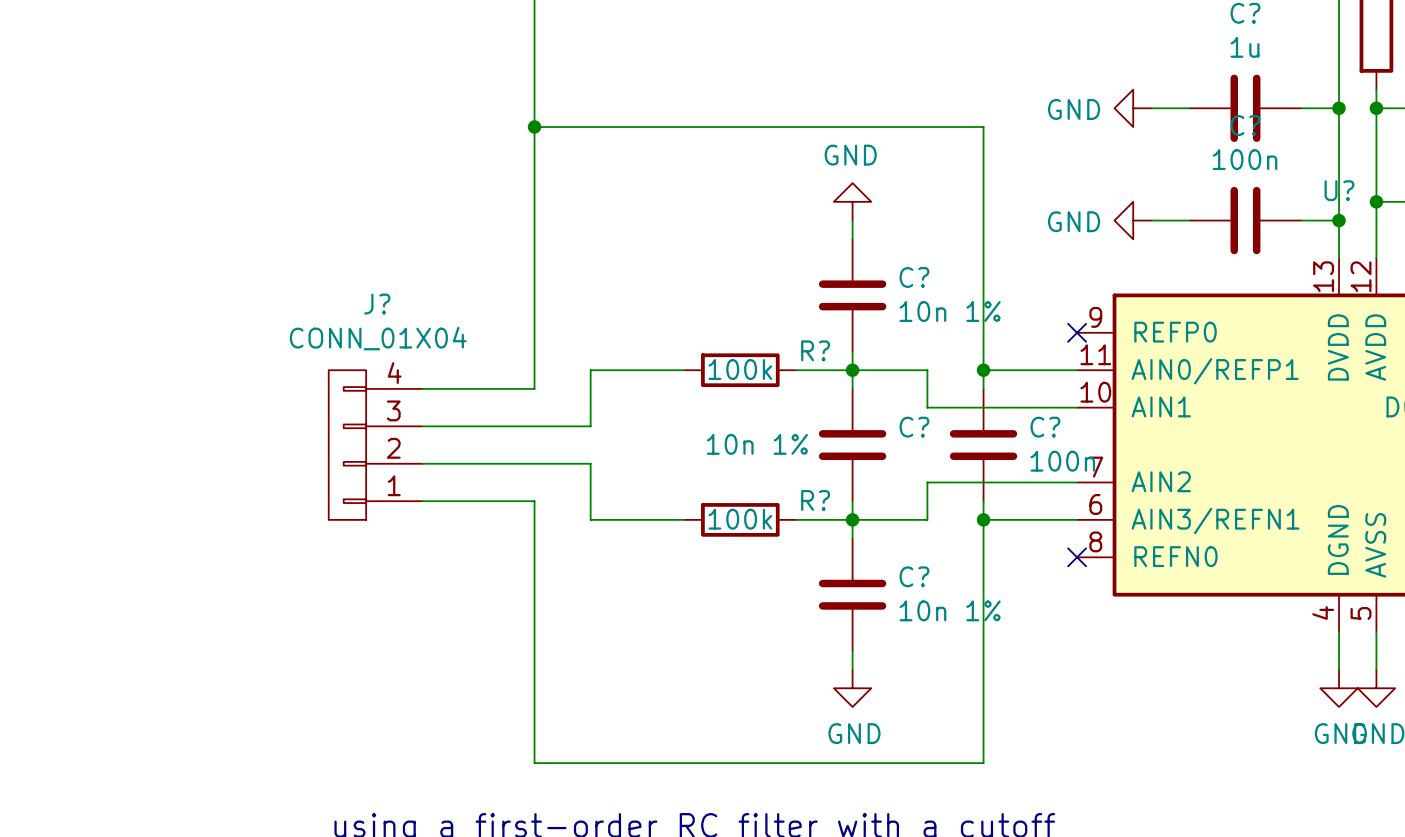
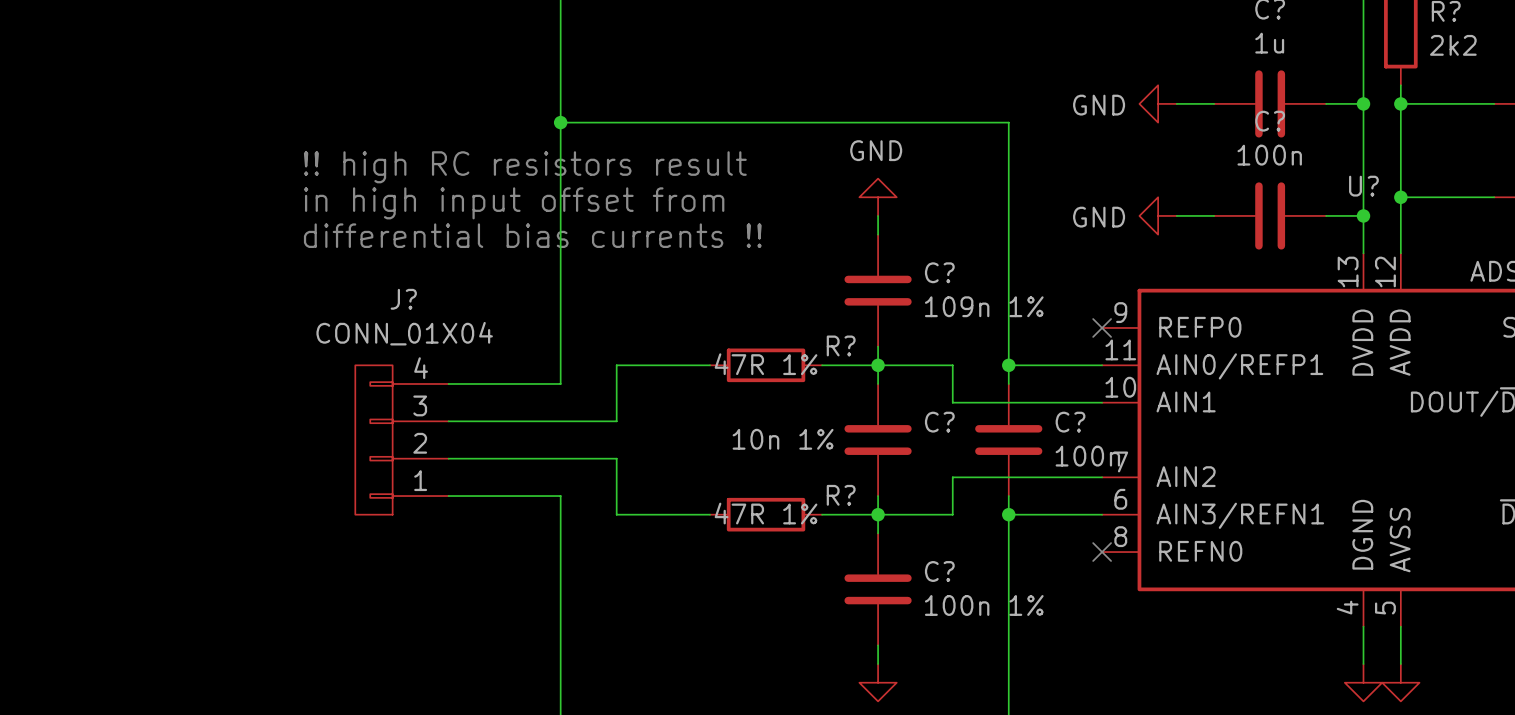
text: none -> !! high RC resistors result (525, 167)
text: none -> in high input offset from (514, 203)
text: none -> differential bias currents !! (532, 235)
C? value: 10n 1% (950, 311) -> 109n 1% (984, 306)
R? value: 100k (740, 369) -> 47R 1% (766, 364)
R? value: 100k (740, 519) -> 47R 1% (766, 513)
C? value: 10n 1% (950, 610) -> 100n 1% (984, 605)

